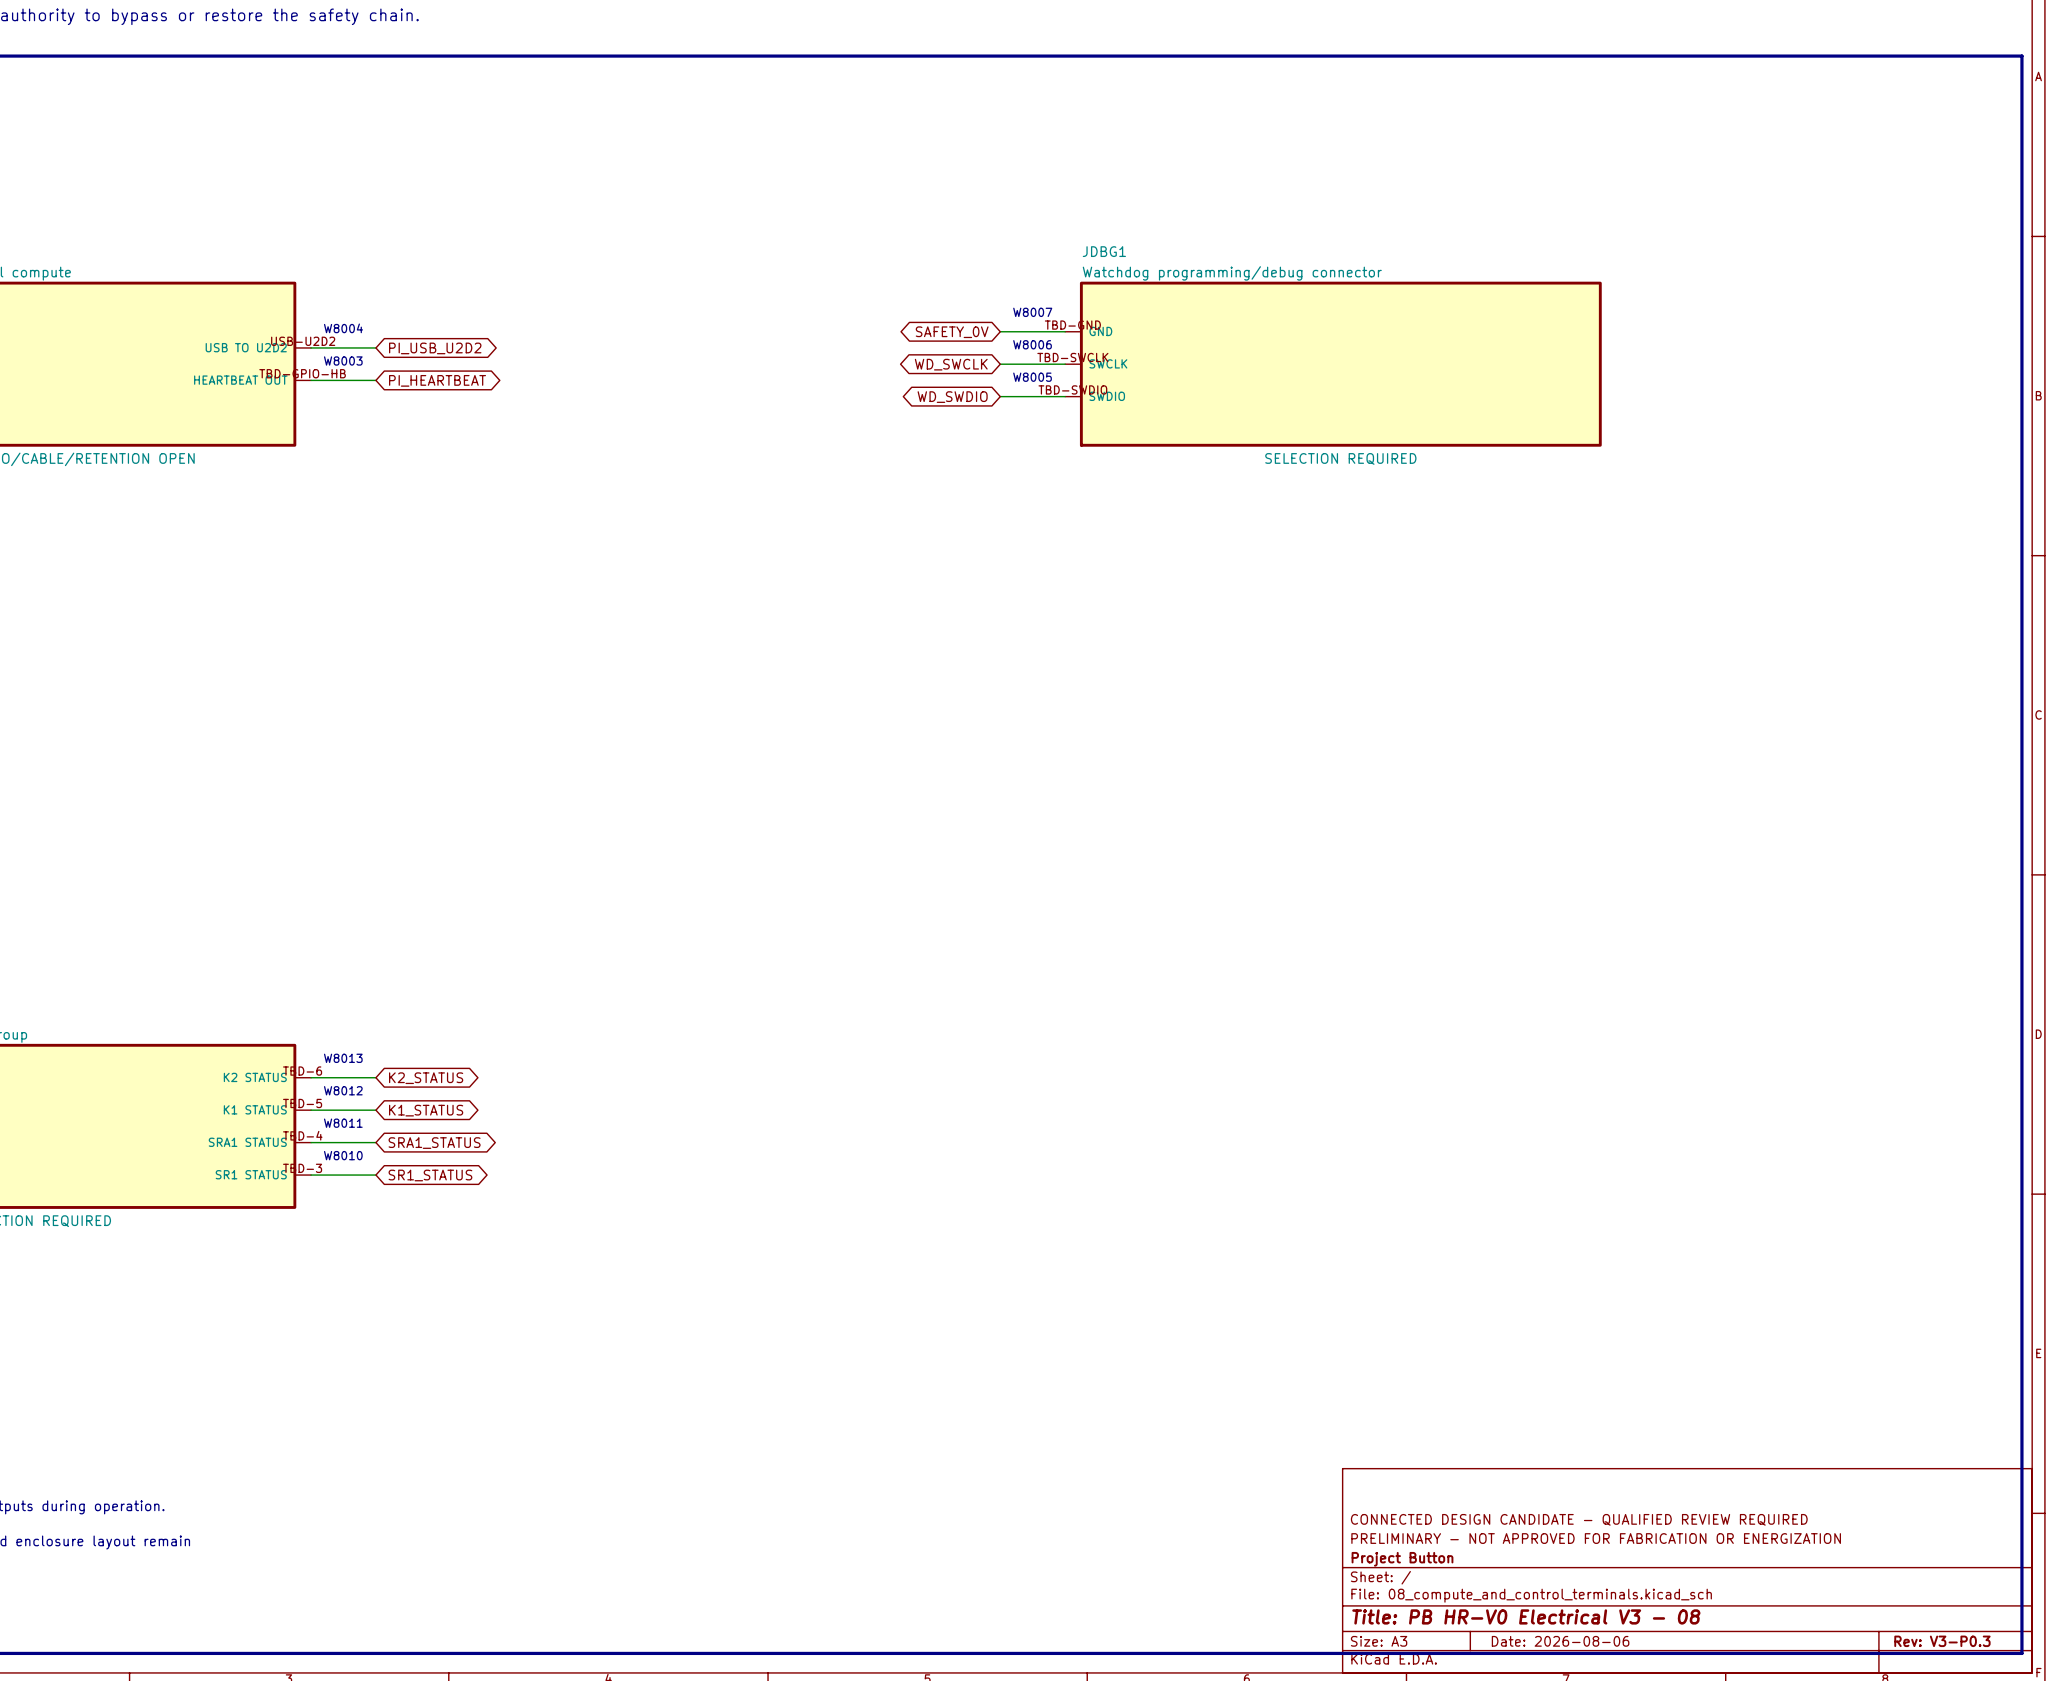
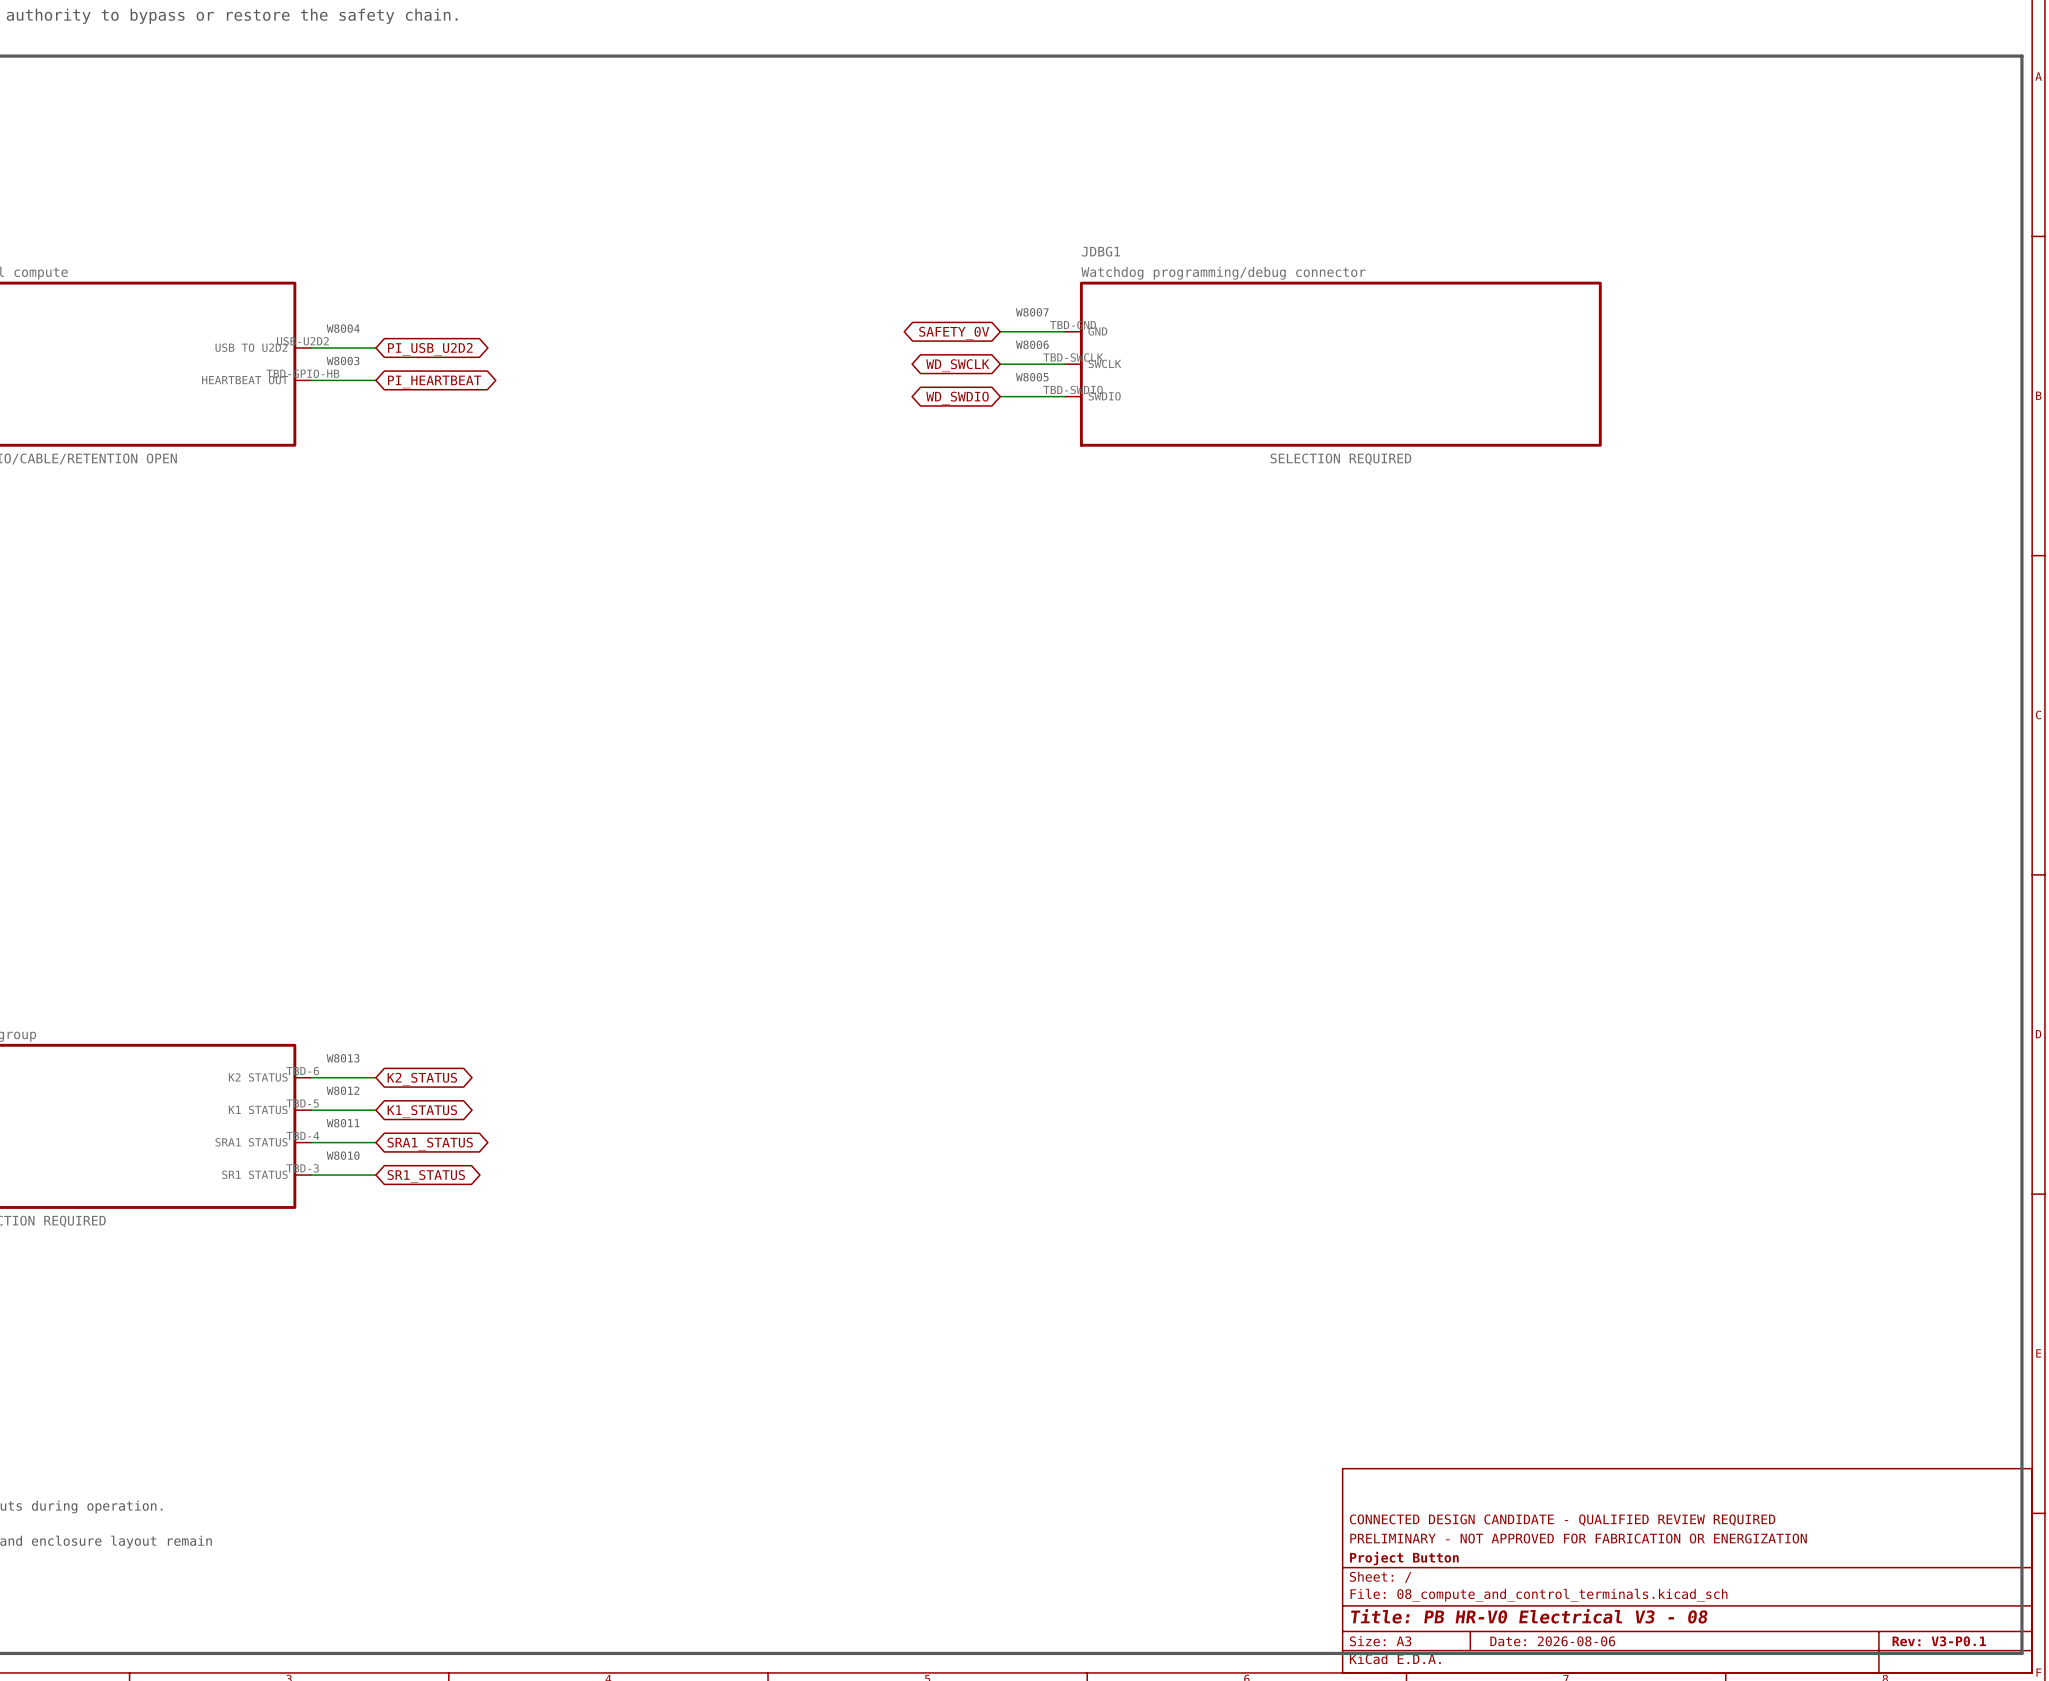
title block: Rev: V3-P0.3 (1942, 1641) -> Rev: V3-P0.1 (1939, 1641)

